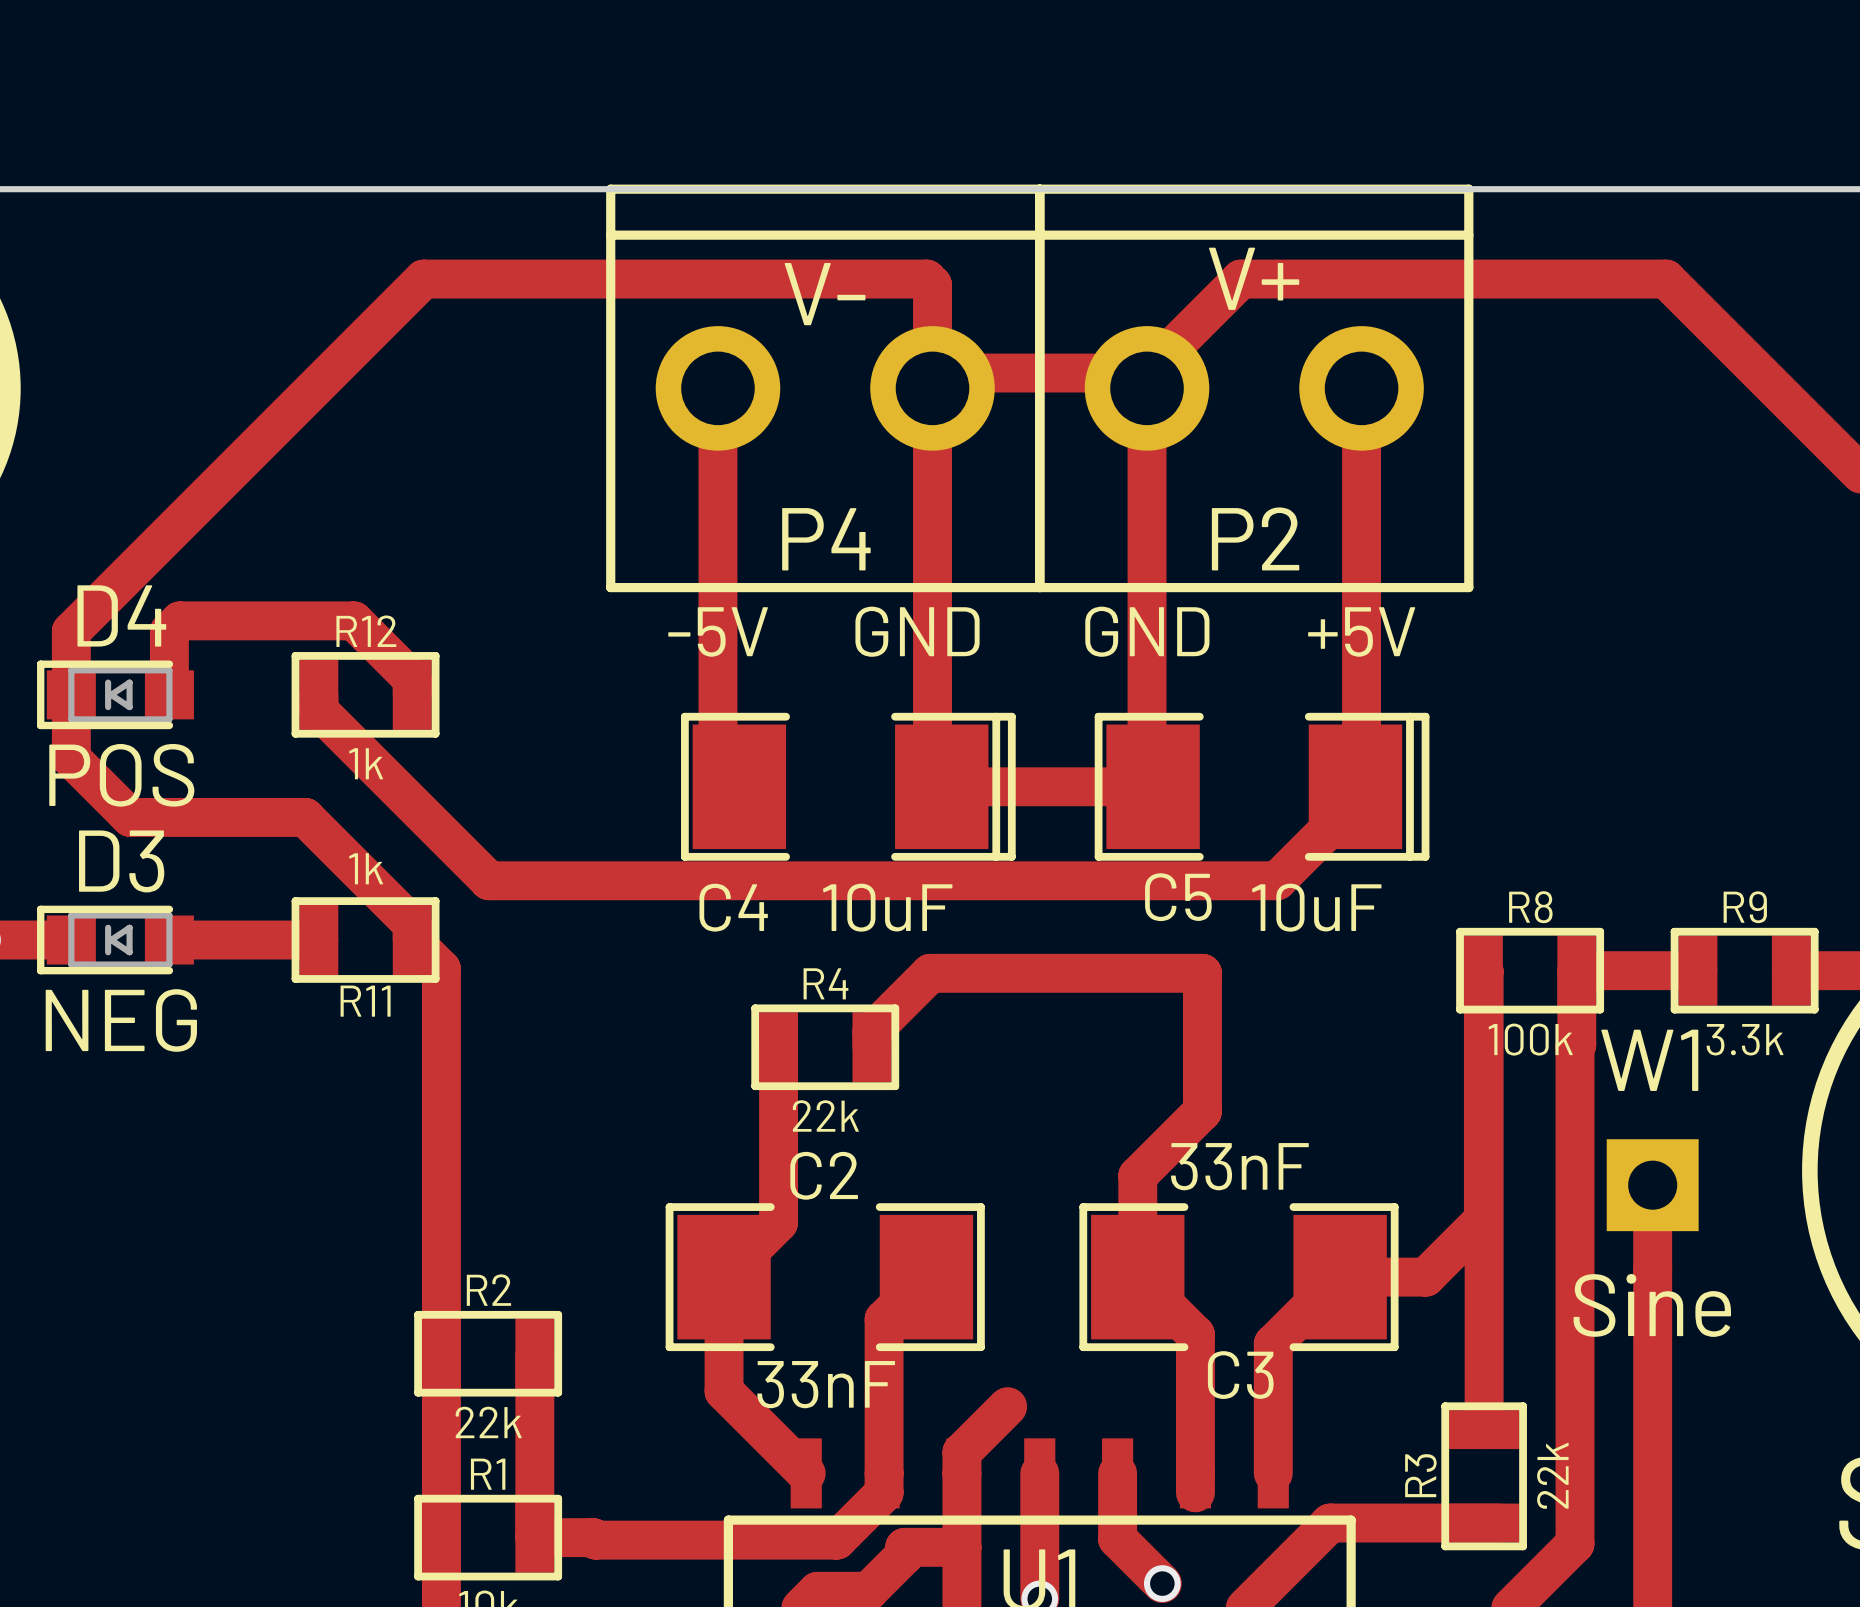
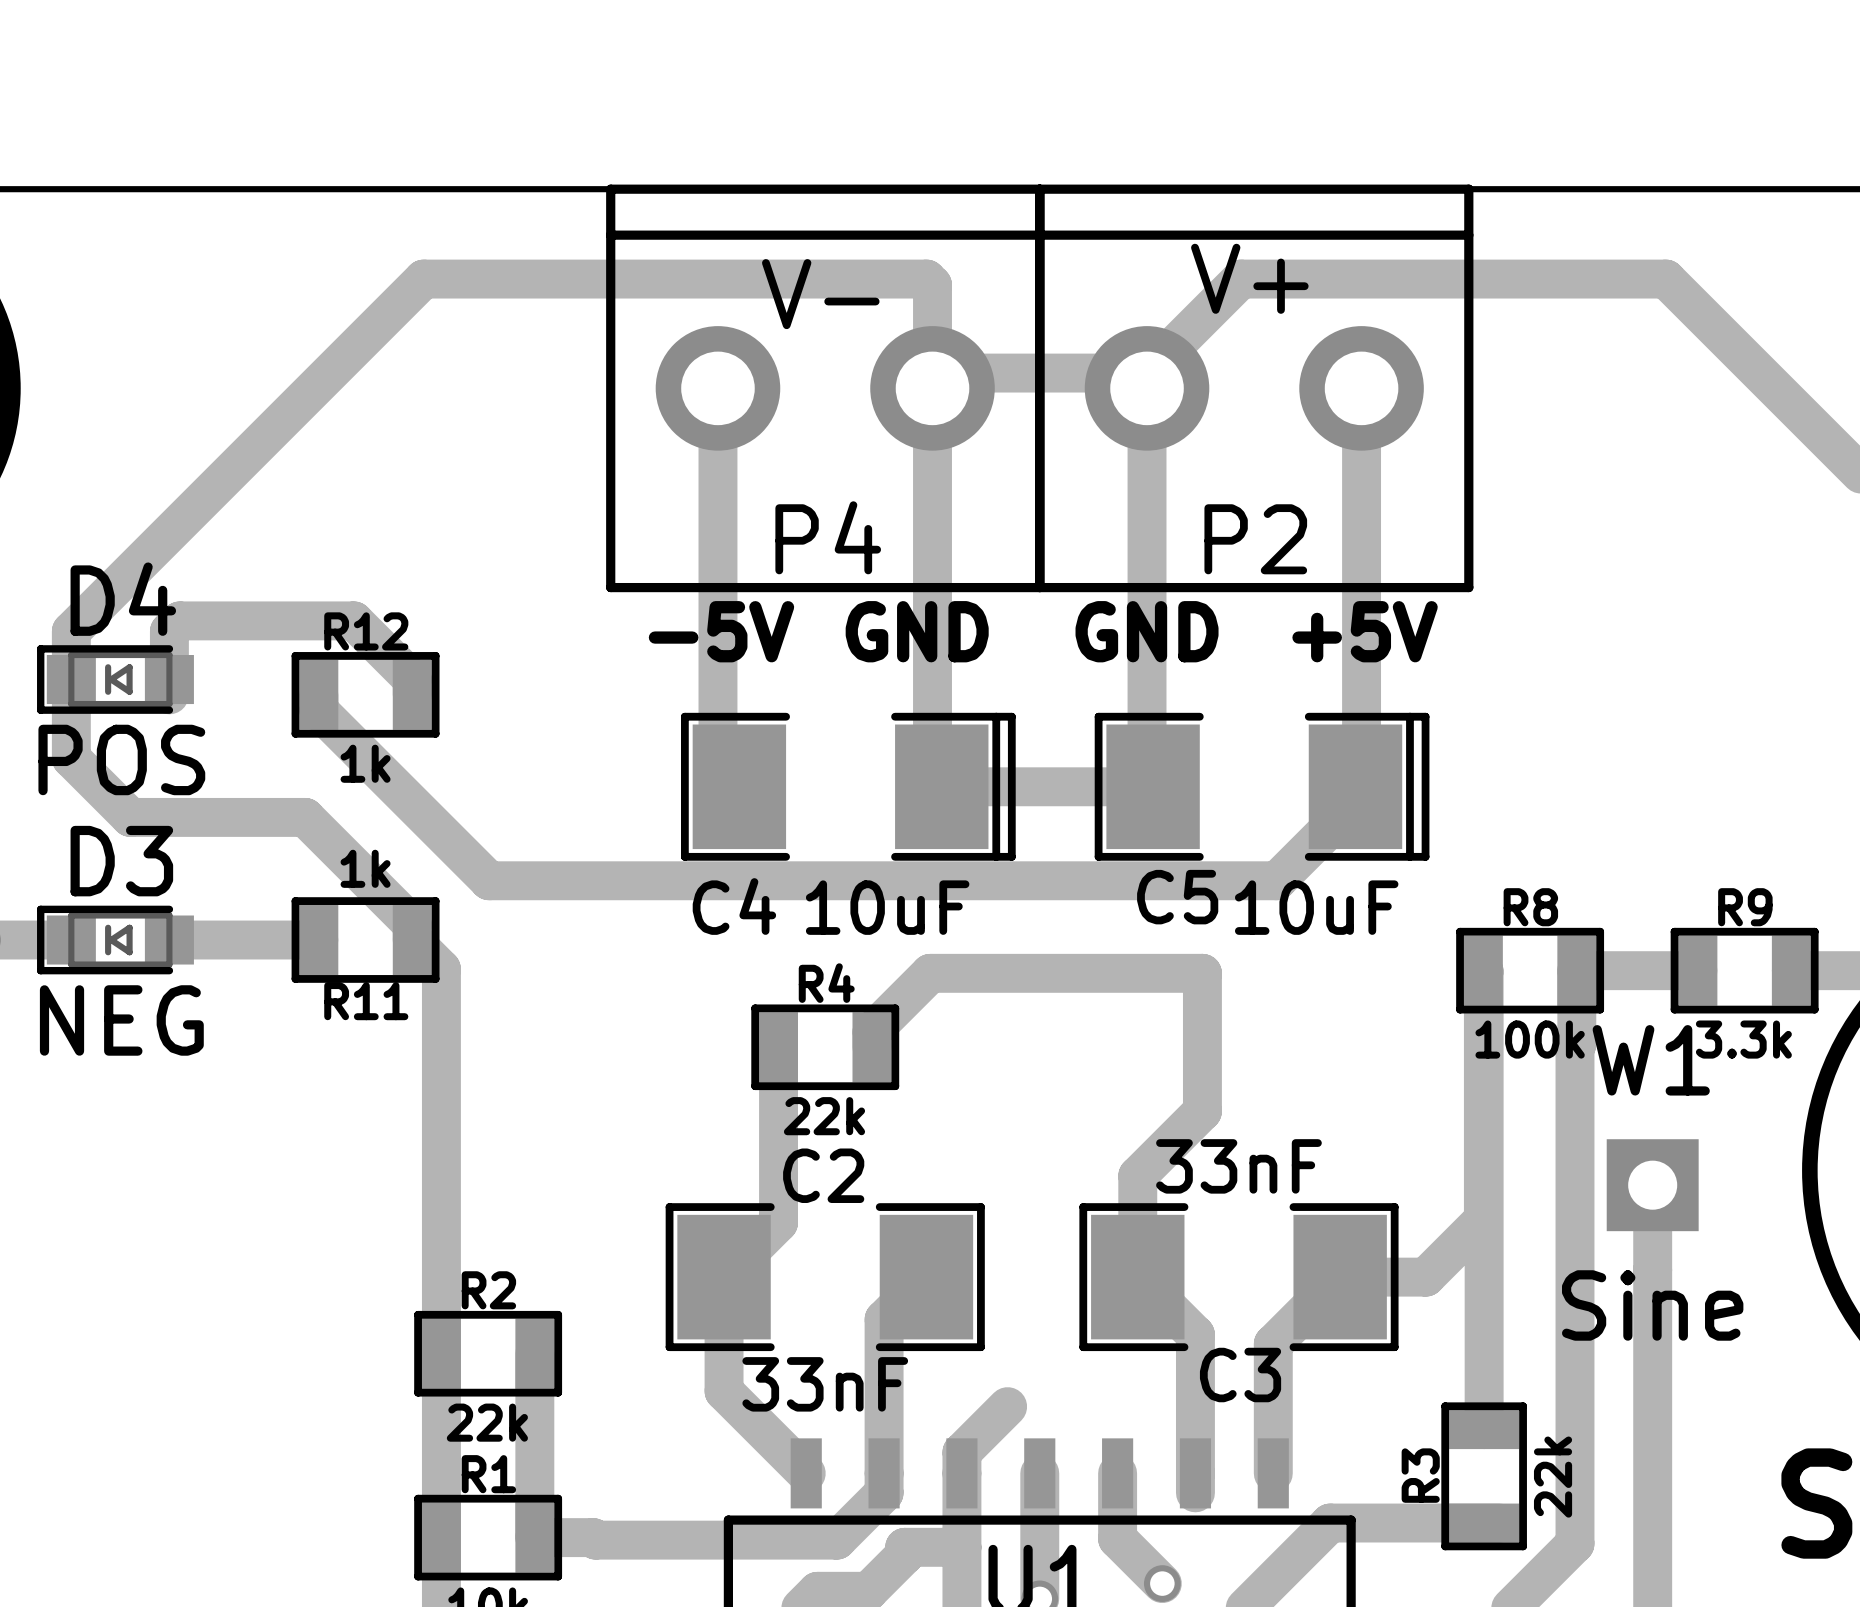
D4 position: (115, 694) -> (115, 679)

